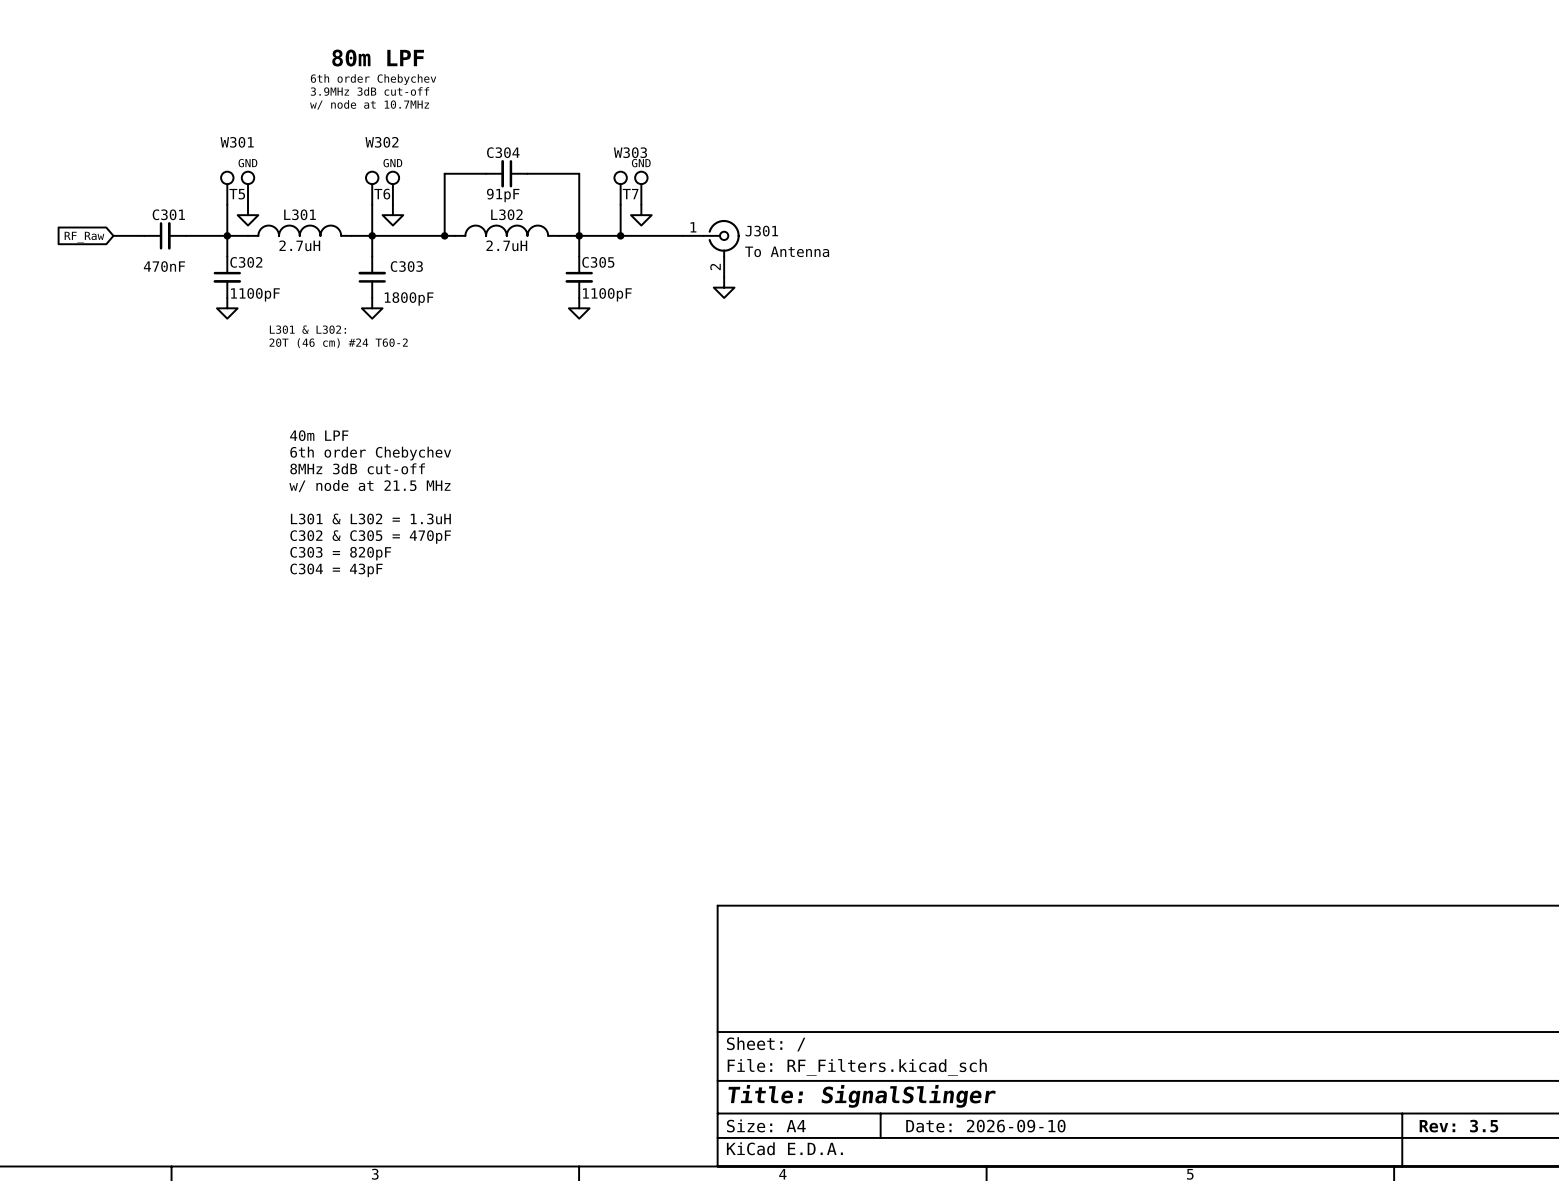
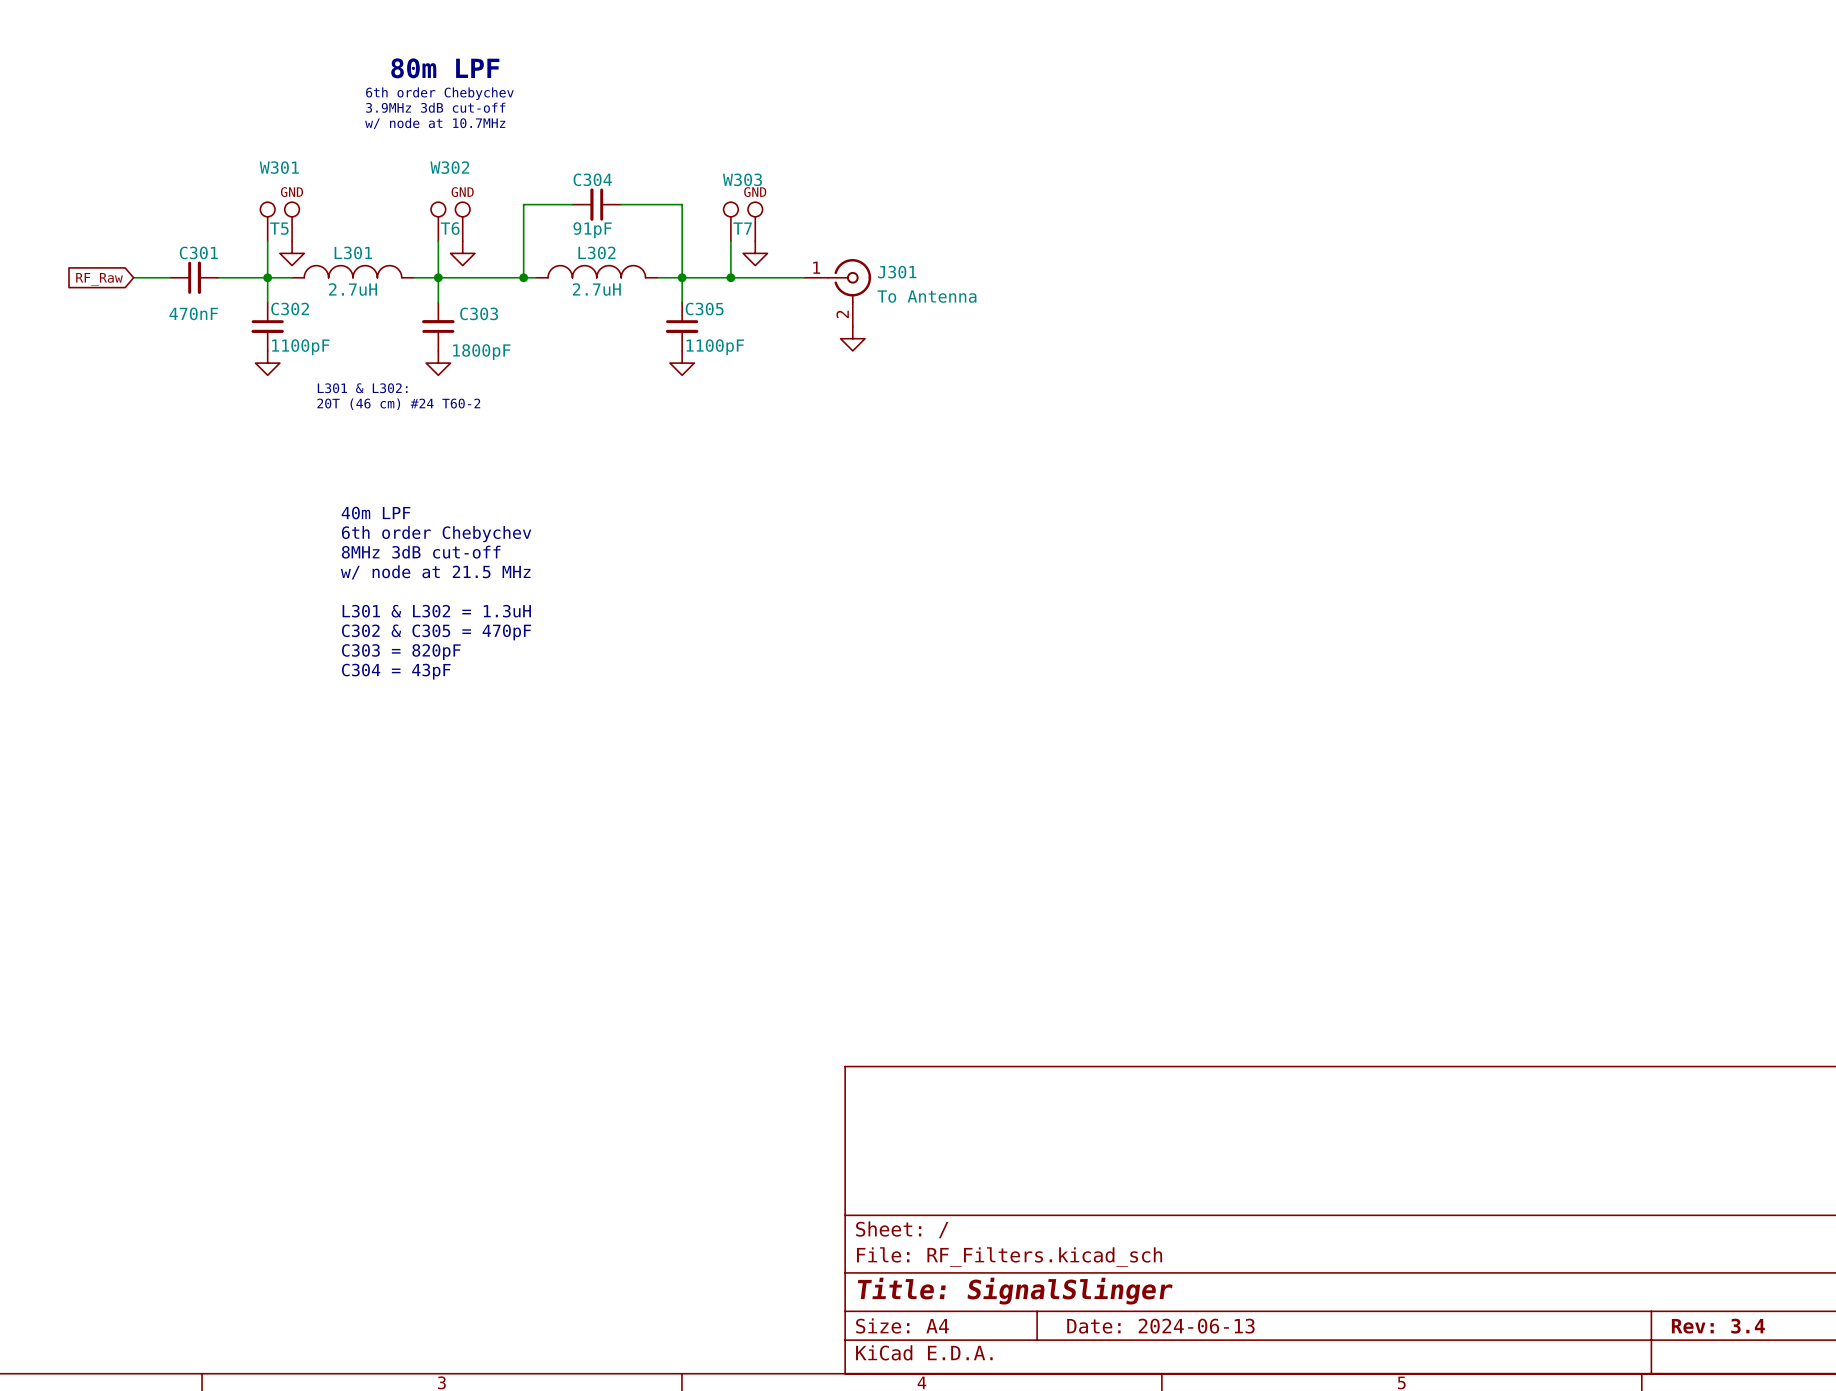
title block: Date: 2026-09-10 (985, 1126) -> Date: 2024-06-13 (1160, 1326)
title block: Rev: 3.5 (1458, 1126) -> Rev: 3.4 (1718, 1326)

